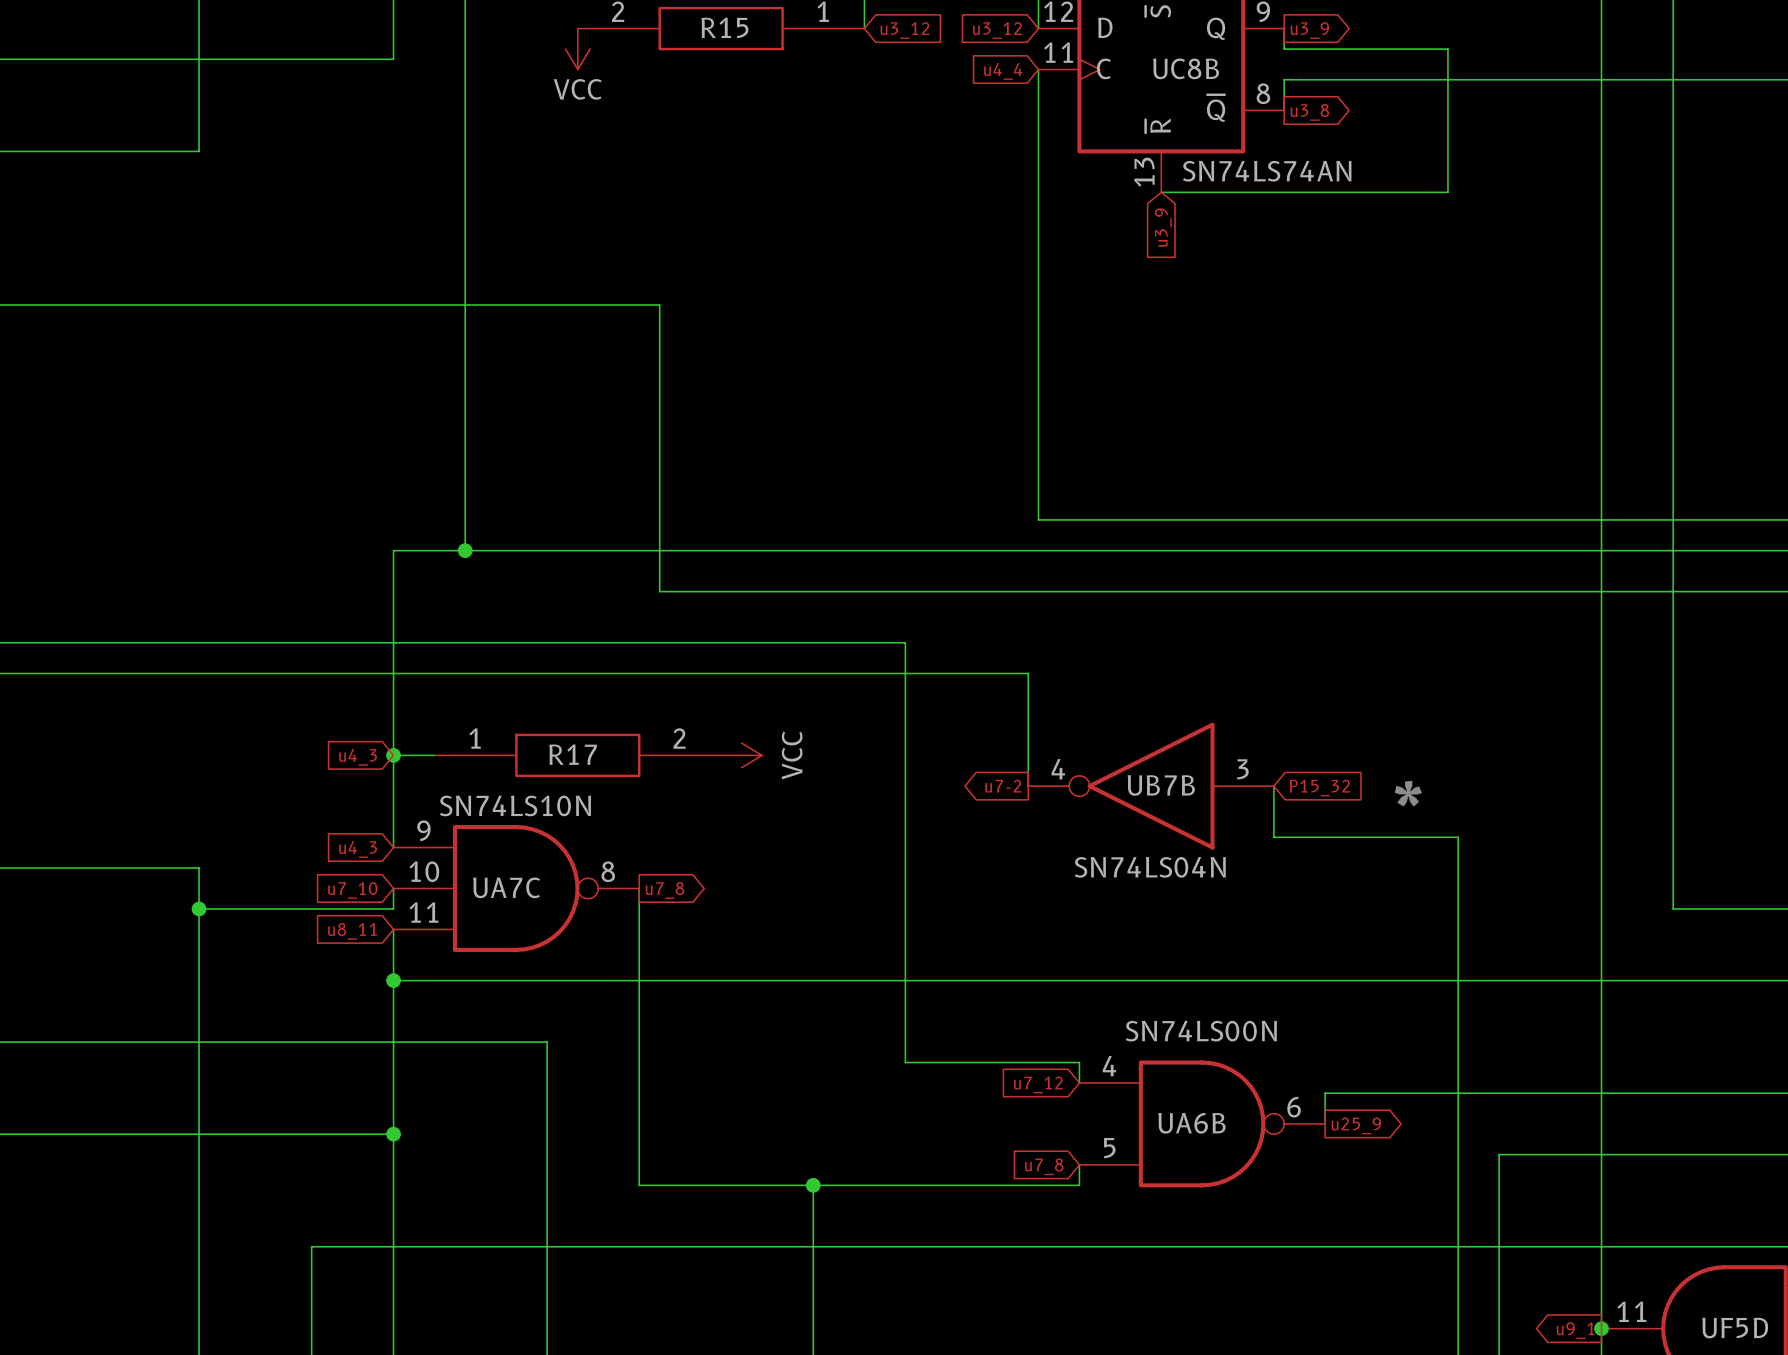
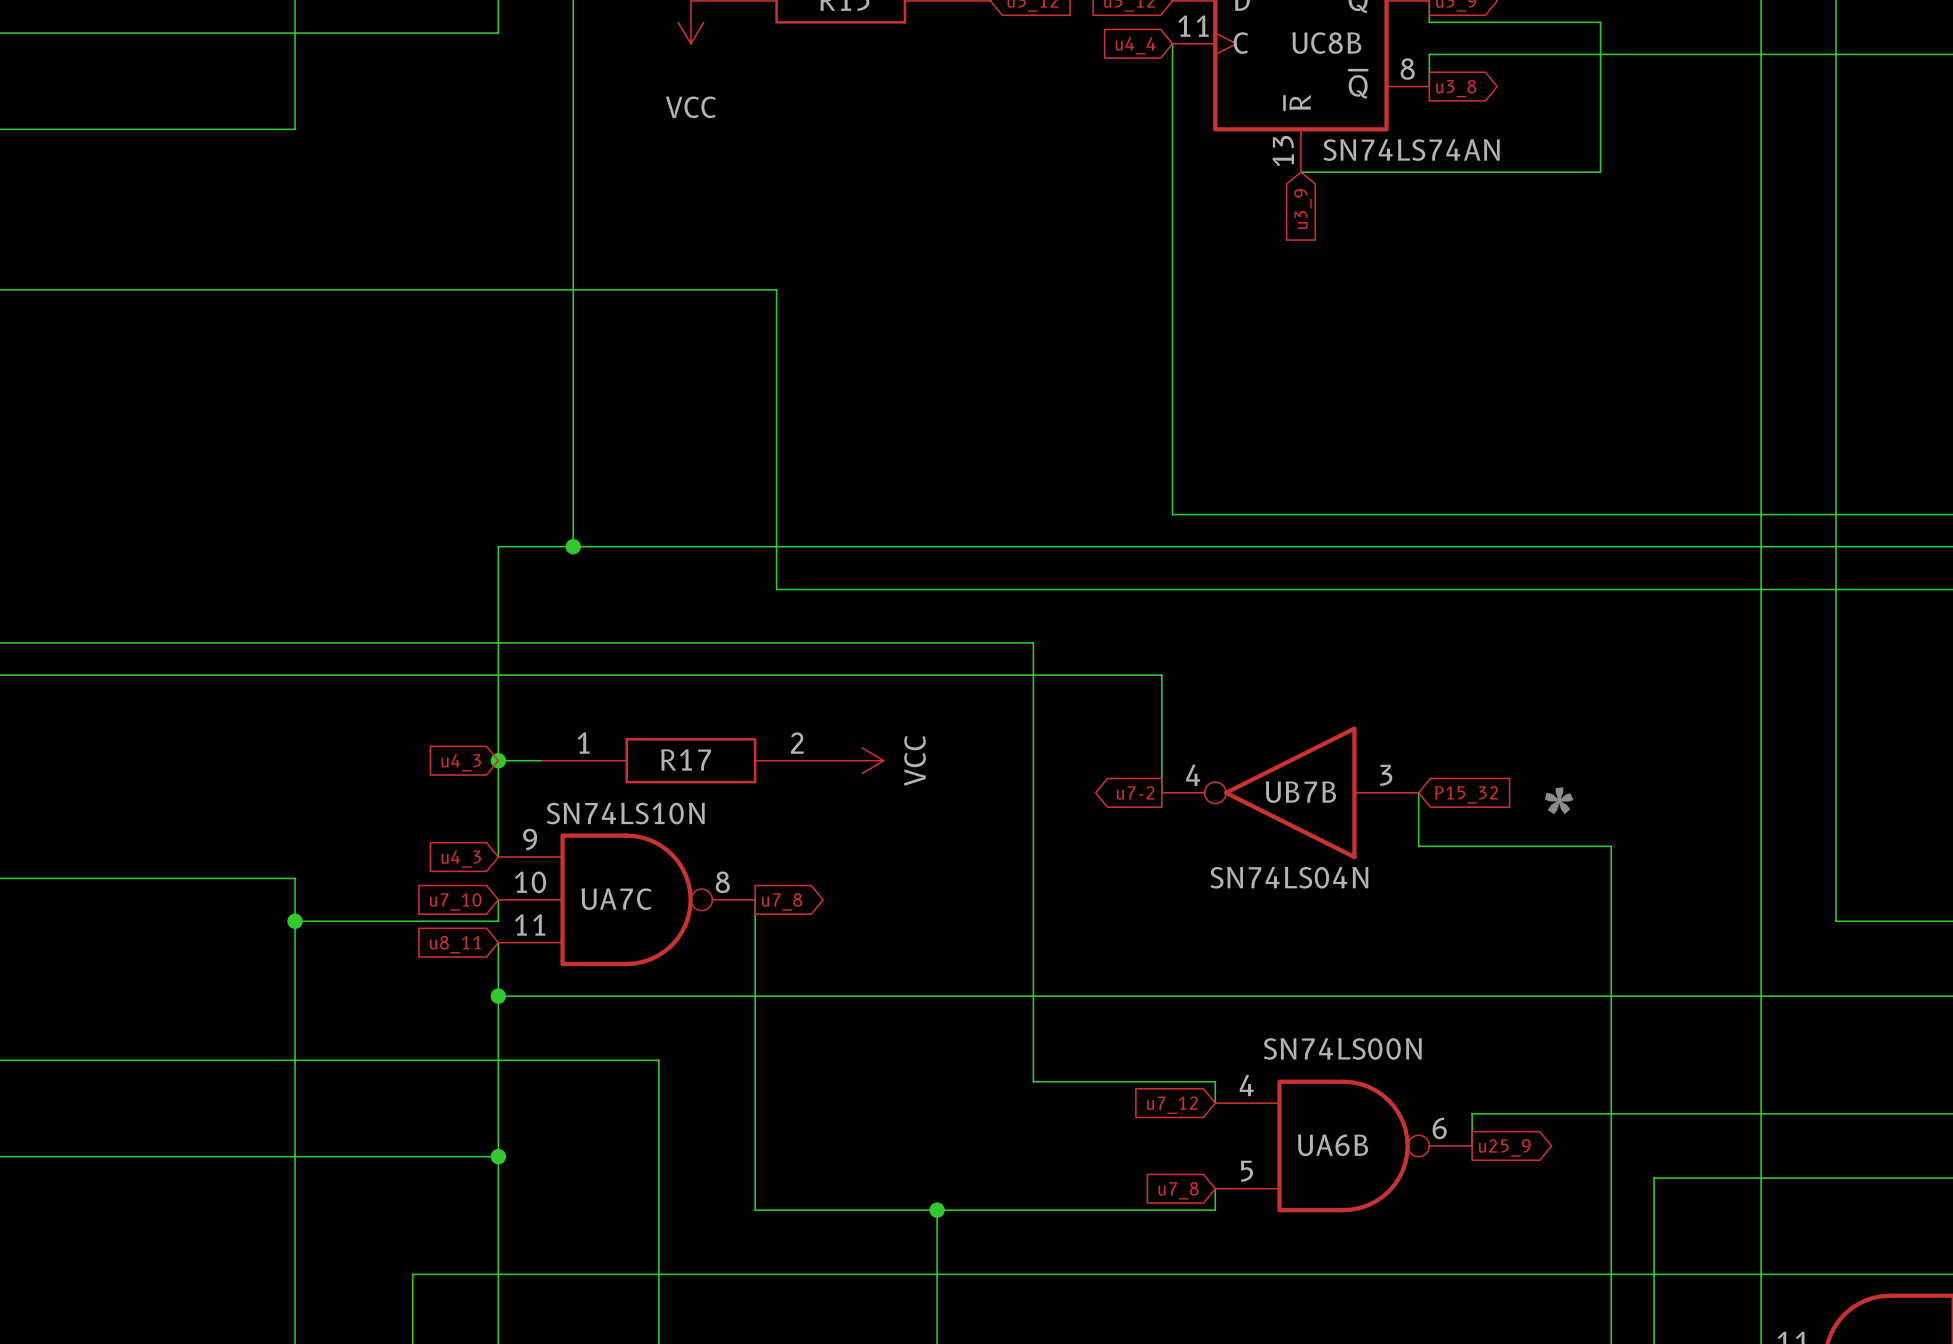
power symbol text position: VCC (577, 89) -> VCC (690, 107)

